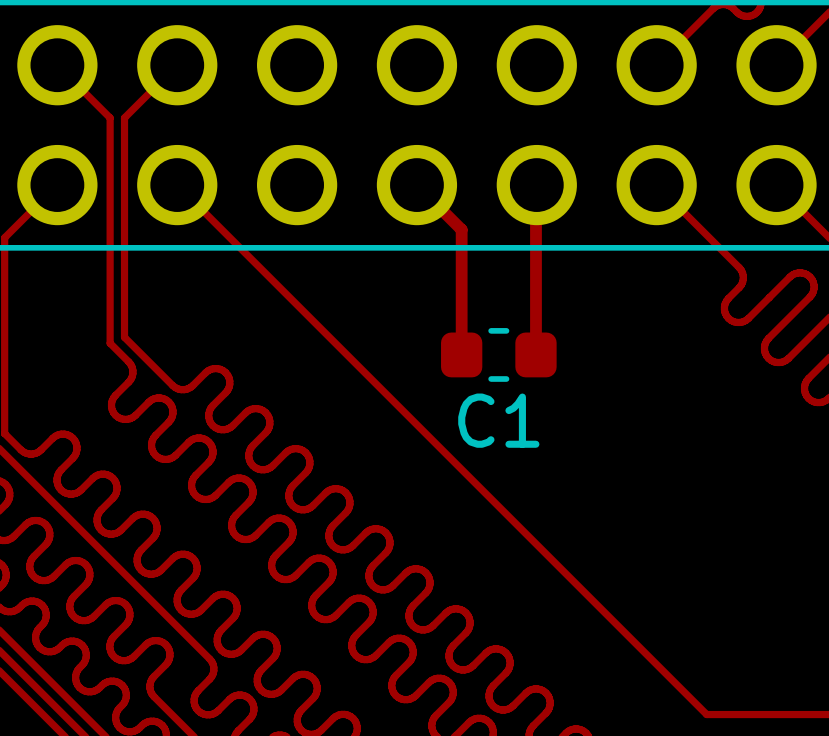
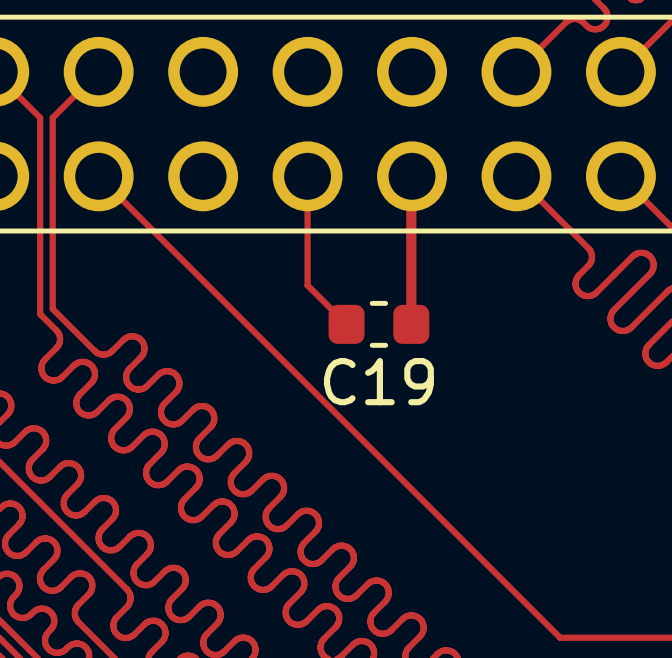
track: (416, 185) (461, 229) (461, 354) -> (307, 176) (307, 285) (346, 324)
C1 name: C1 (498, 420) -> C19 (378, 381)

